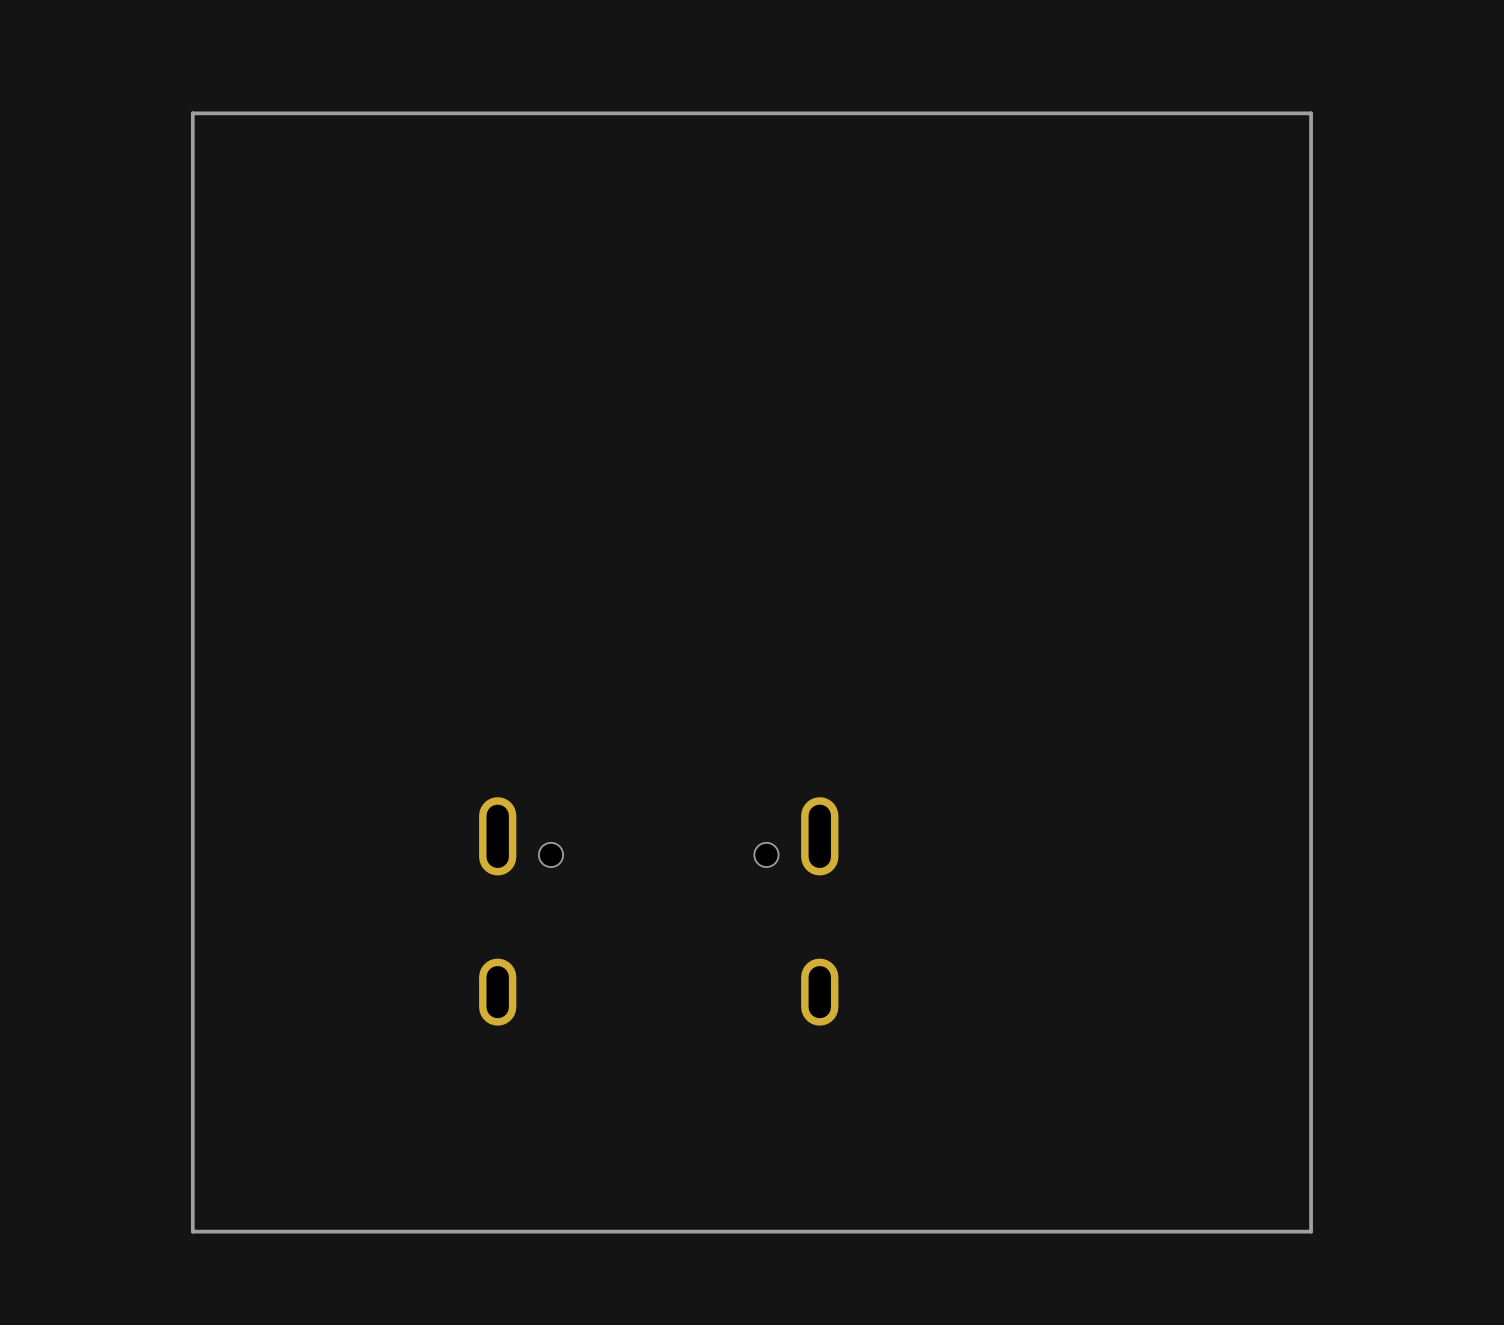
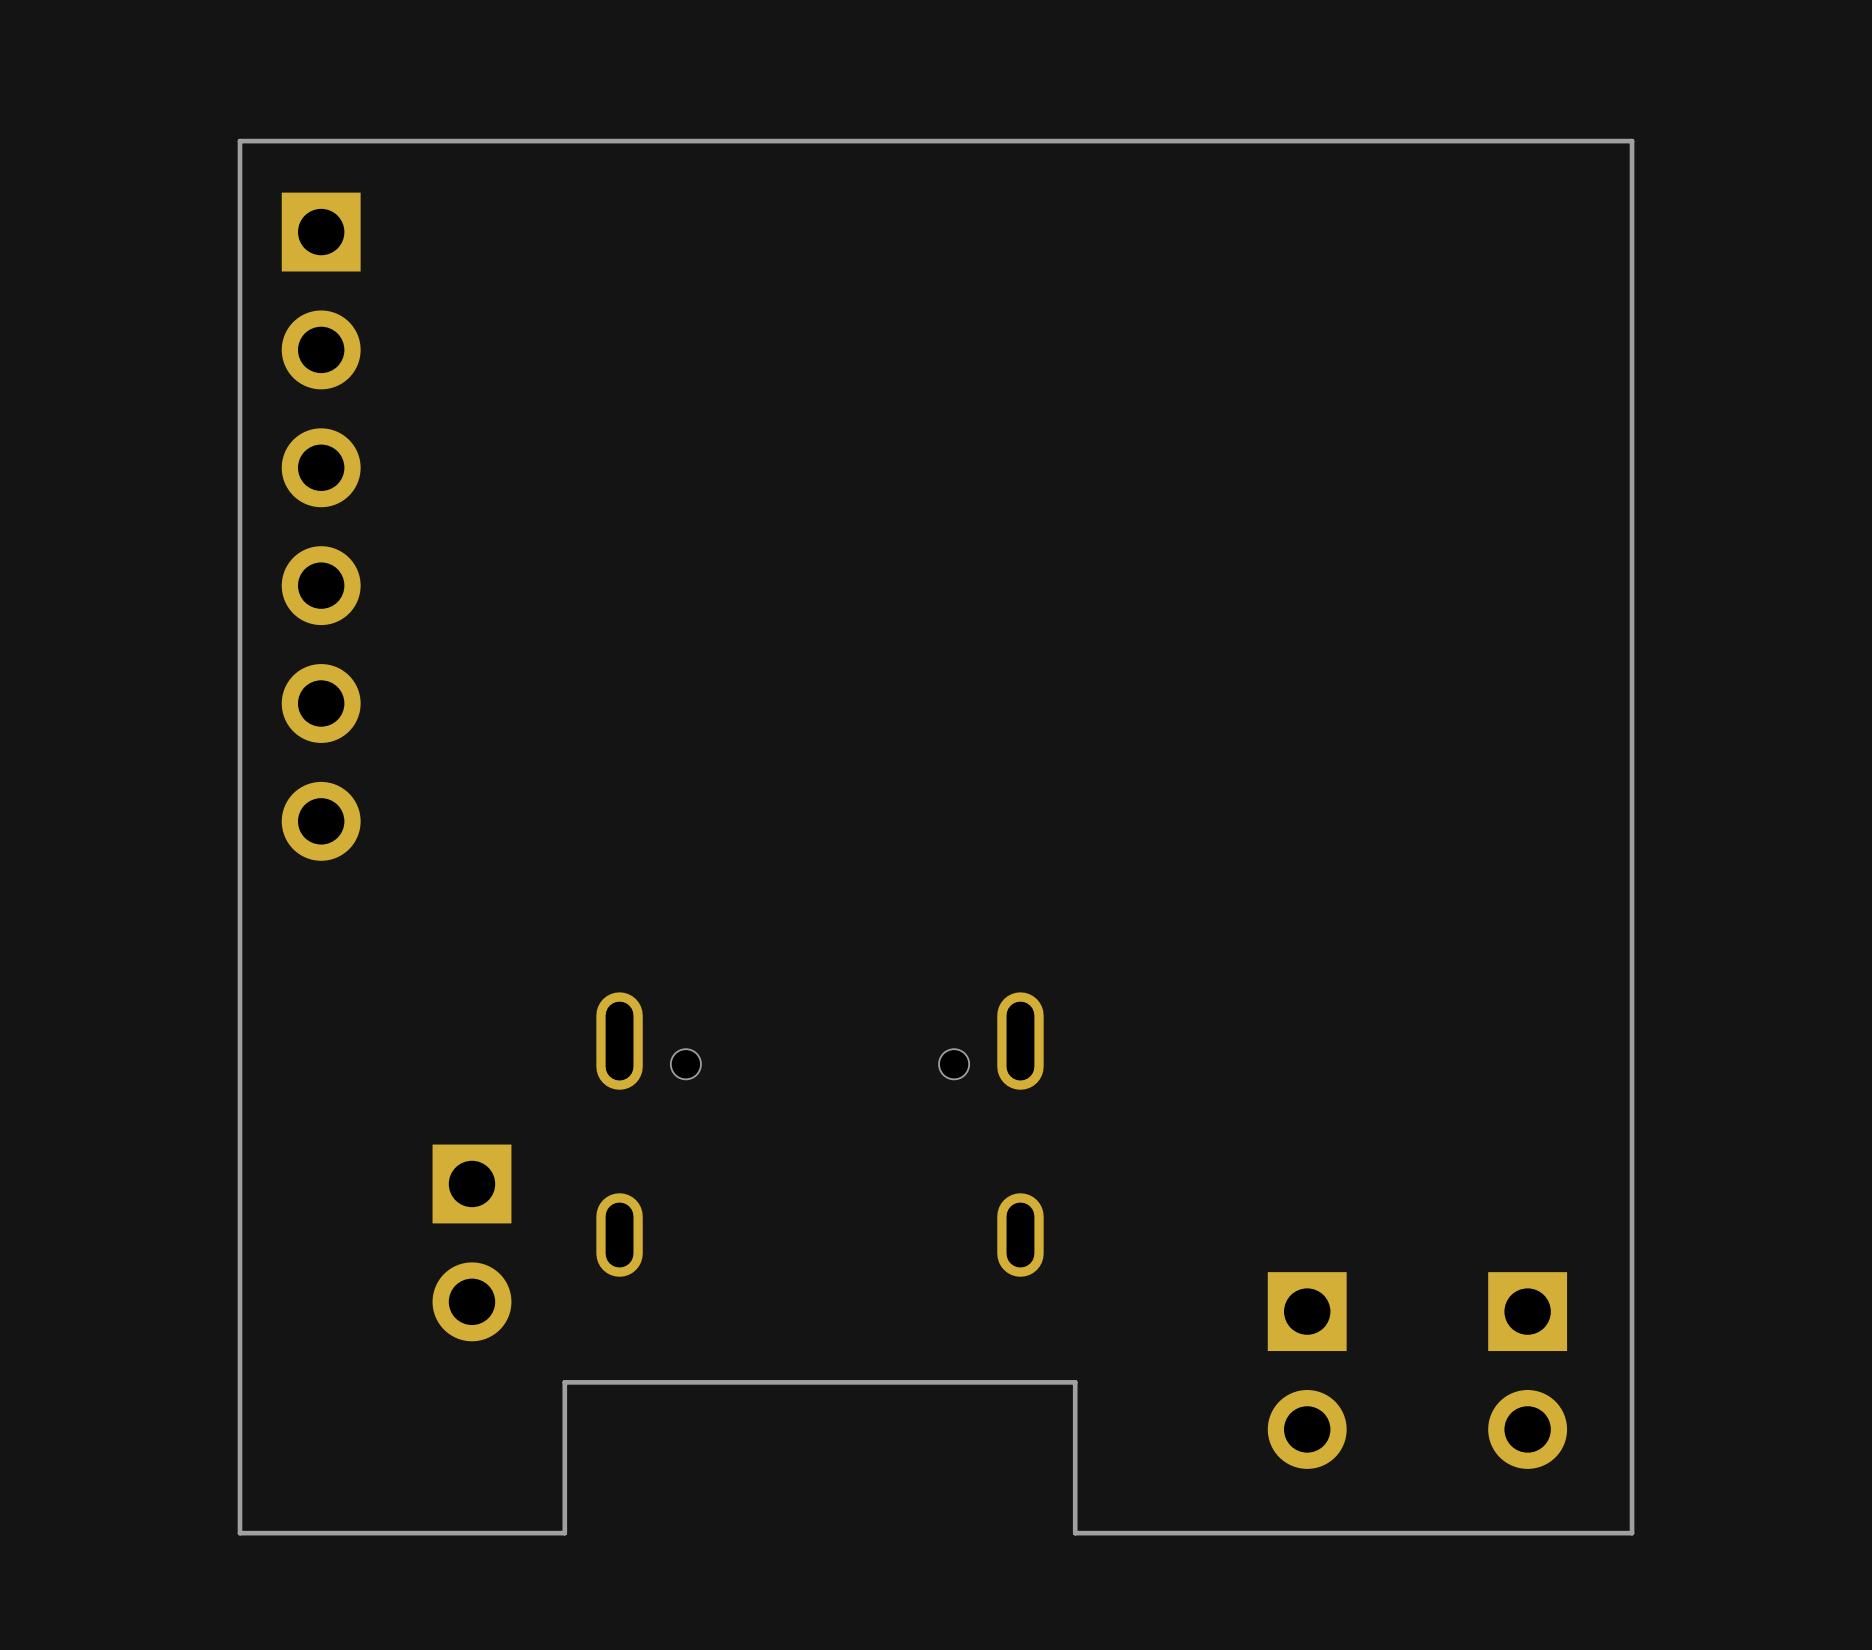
part: none -> (321, 526)
part: none -> (471, 1242)
part: none -> (1307, 1370)
part: none -> (1527, 1370)
board edge: (863, 1231) (453, 1231) -> (1075, 1533) (1075, 1382) (564, 1382) (564, 1533)

